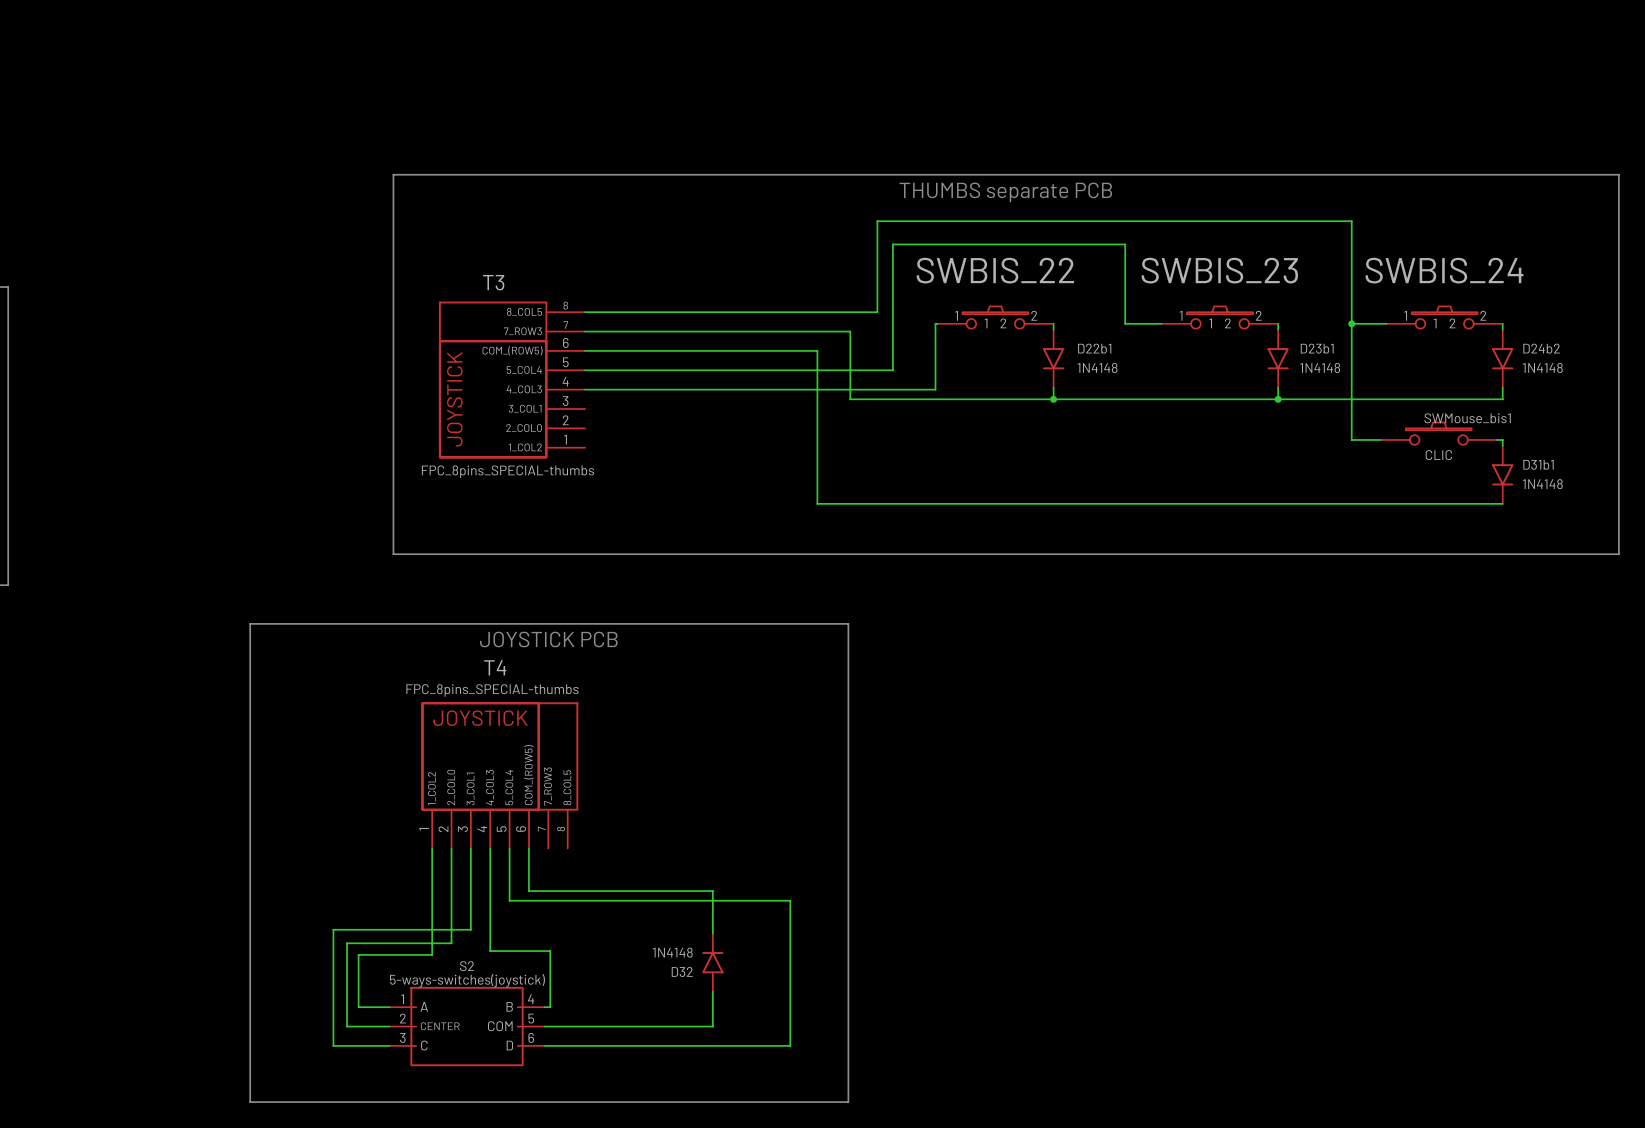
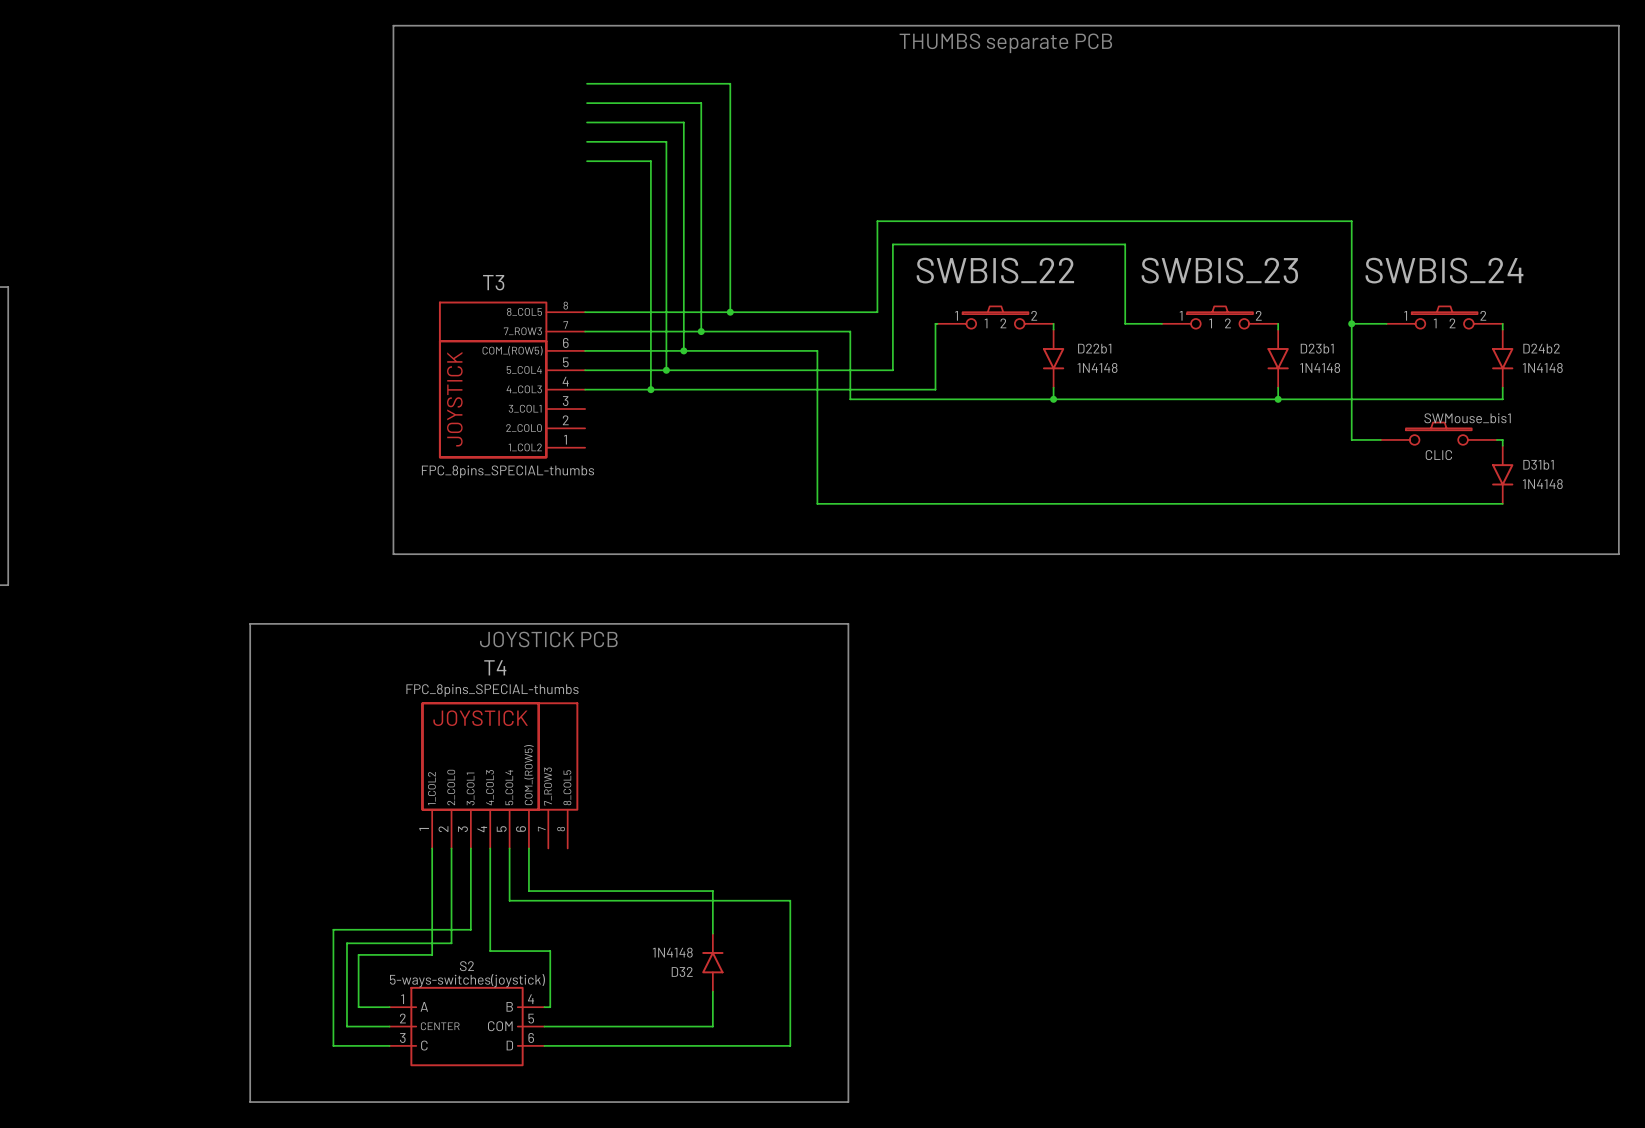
wire: none -> (587, 83) (730, 83) (730, 312)
wire: none -> (587, 103) (701, 103) (701, 331)
wire: none -> (587, 122) (683, 122) (683, 350)
wire: none -> (587, 141) (666, 141) (666, 370)
wire: none -> (587, 161) (650, 161) (650, 389)
line: (393, 174) (1618, 174) -> (393, 174) (393, 25) (1618, 25) (1618, 174)
text position: THUMBS separate PCB (1005, 192) -> THUMBS separate PCB (1005, 43)
junction: none -> (730, 312)
junction: none -> (701, 331)
junction: none -> (683, 350)
junction: none -> (666, 370)
junction: none -> (650, 389)

